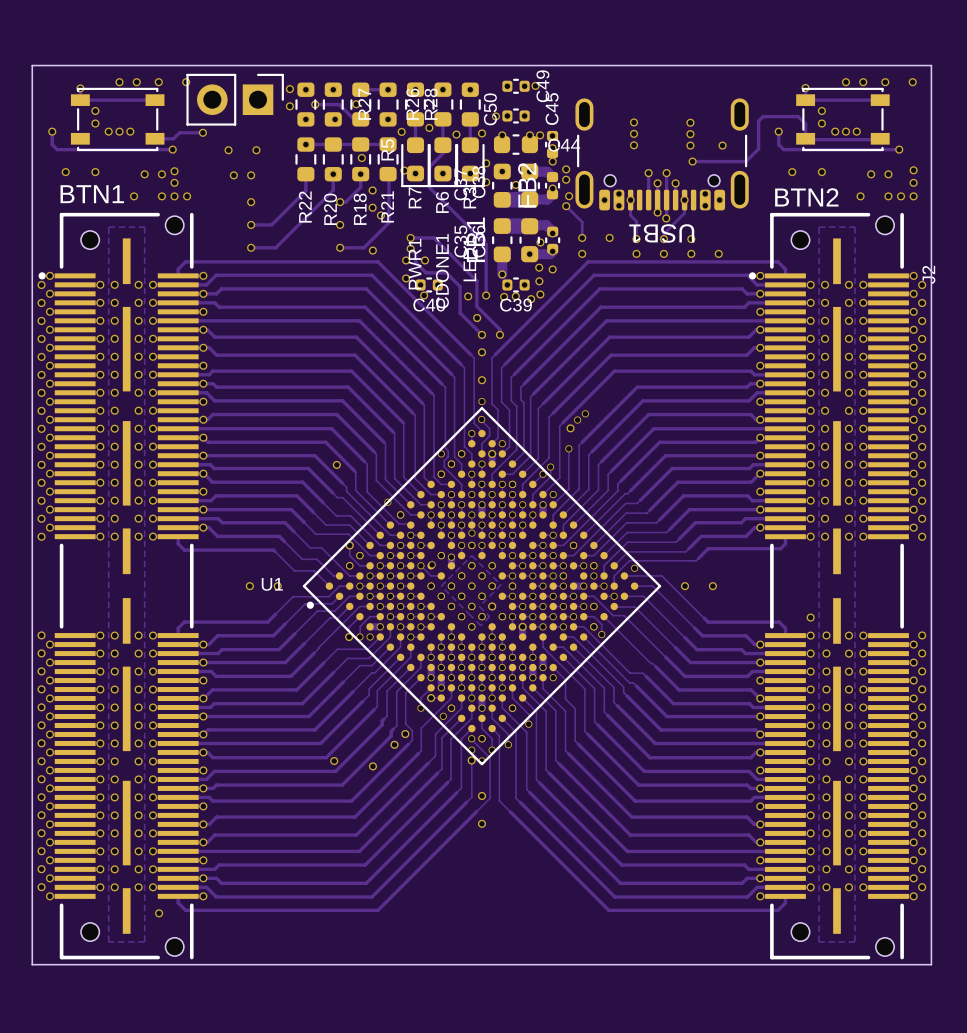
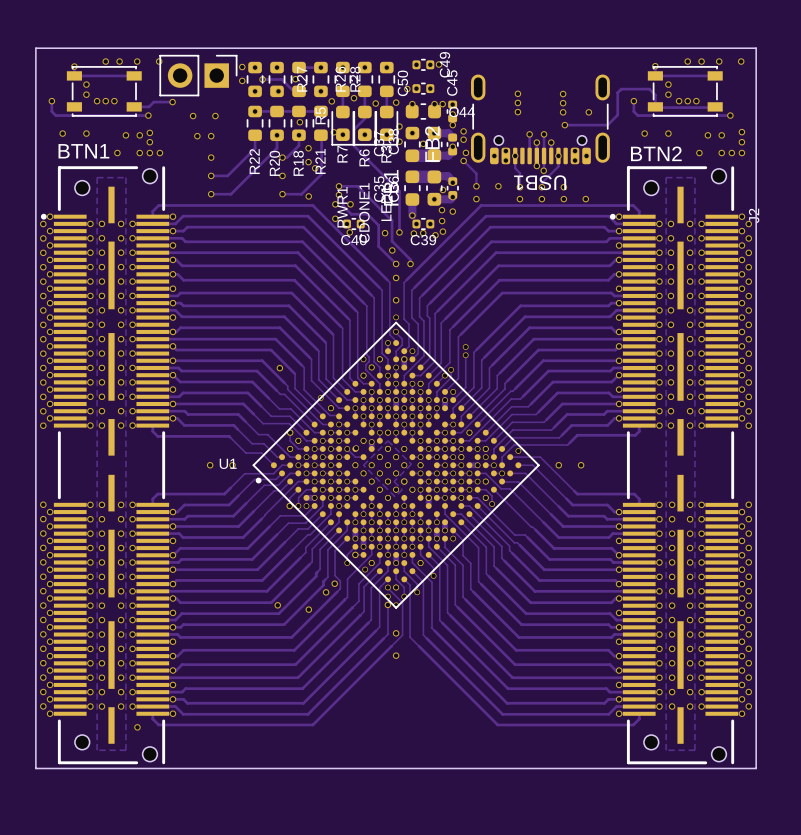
via: (585, 413) -> none
via: (577, 420) -> none
via: (570, 428) -> none
via: none -> (465, 347)
via: (471, 533) -> none
via: (810, 617) -> none

